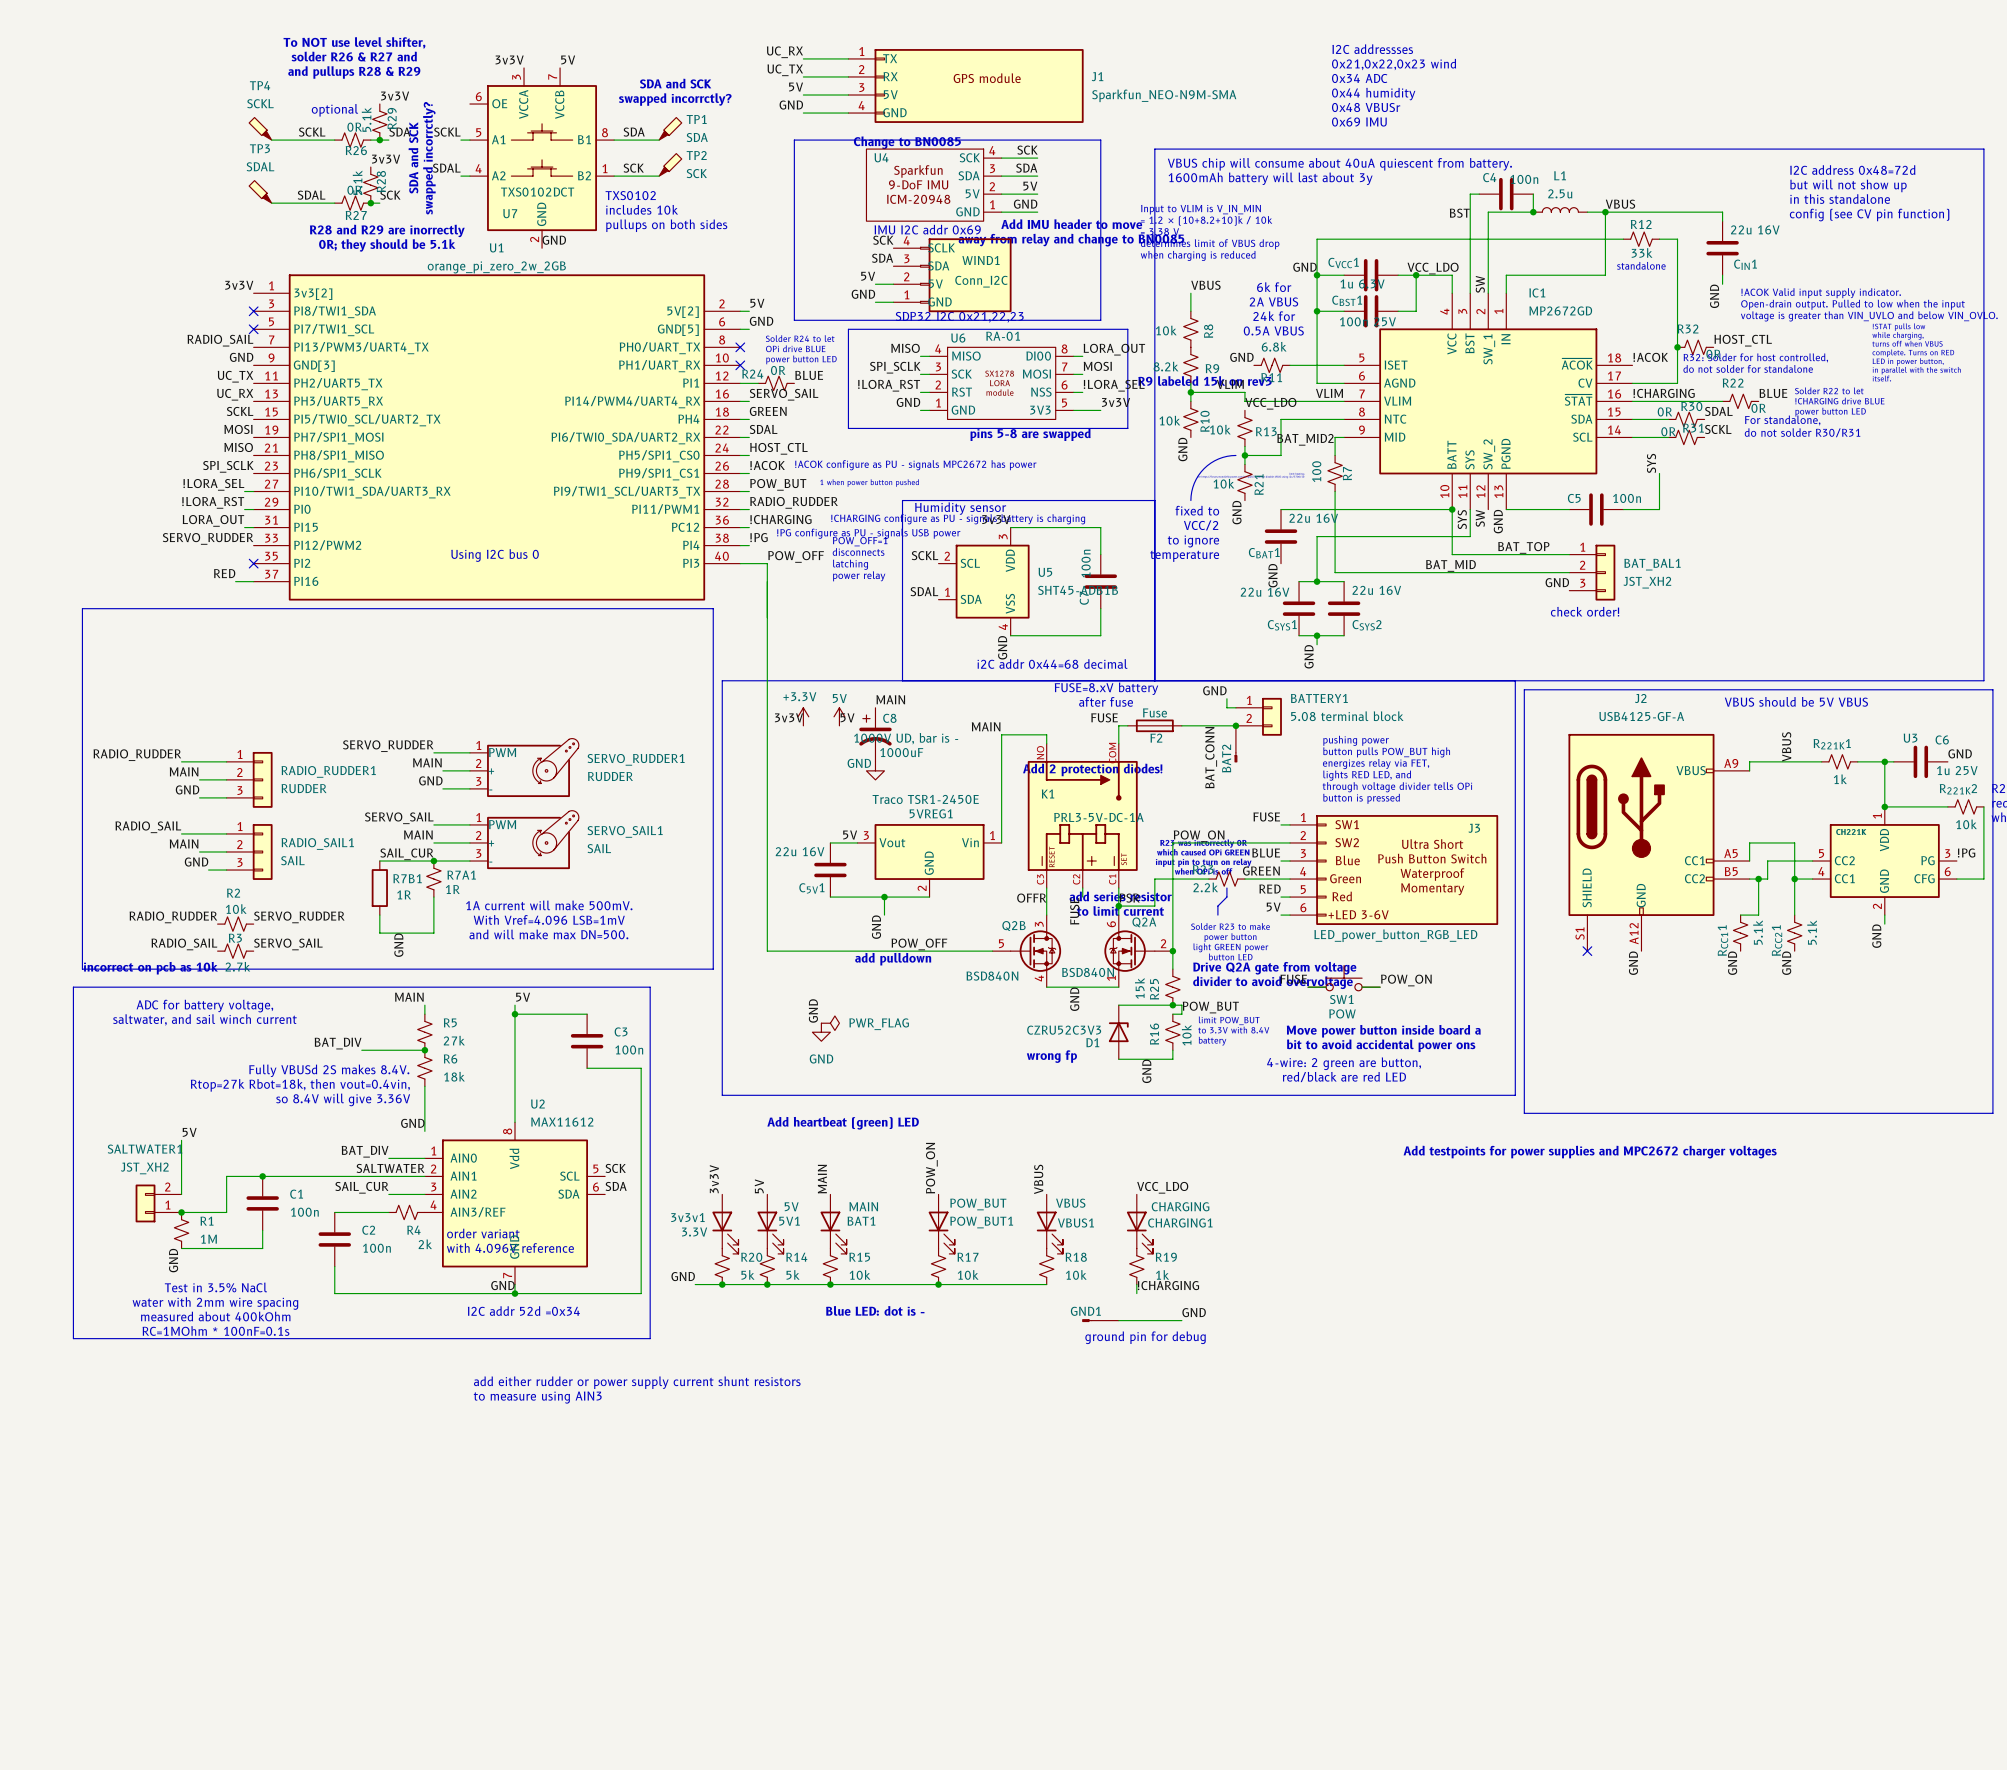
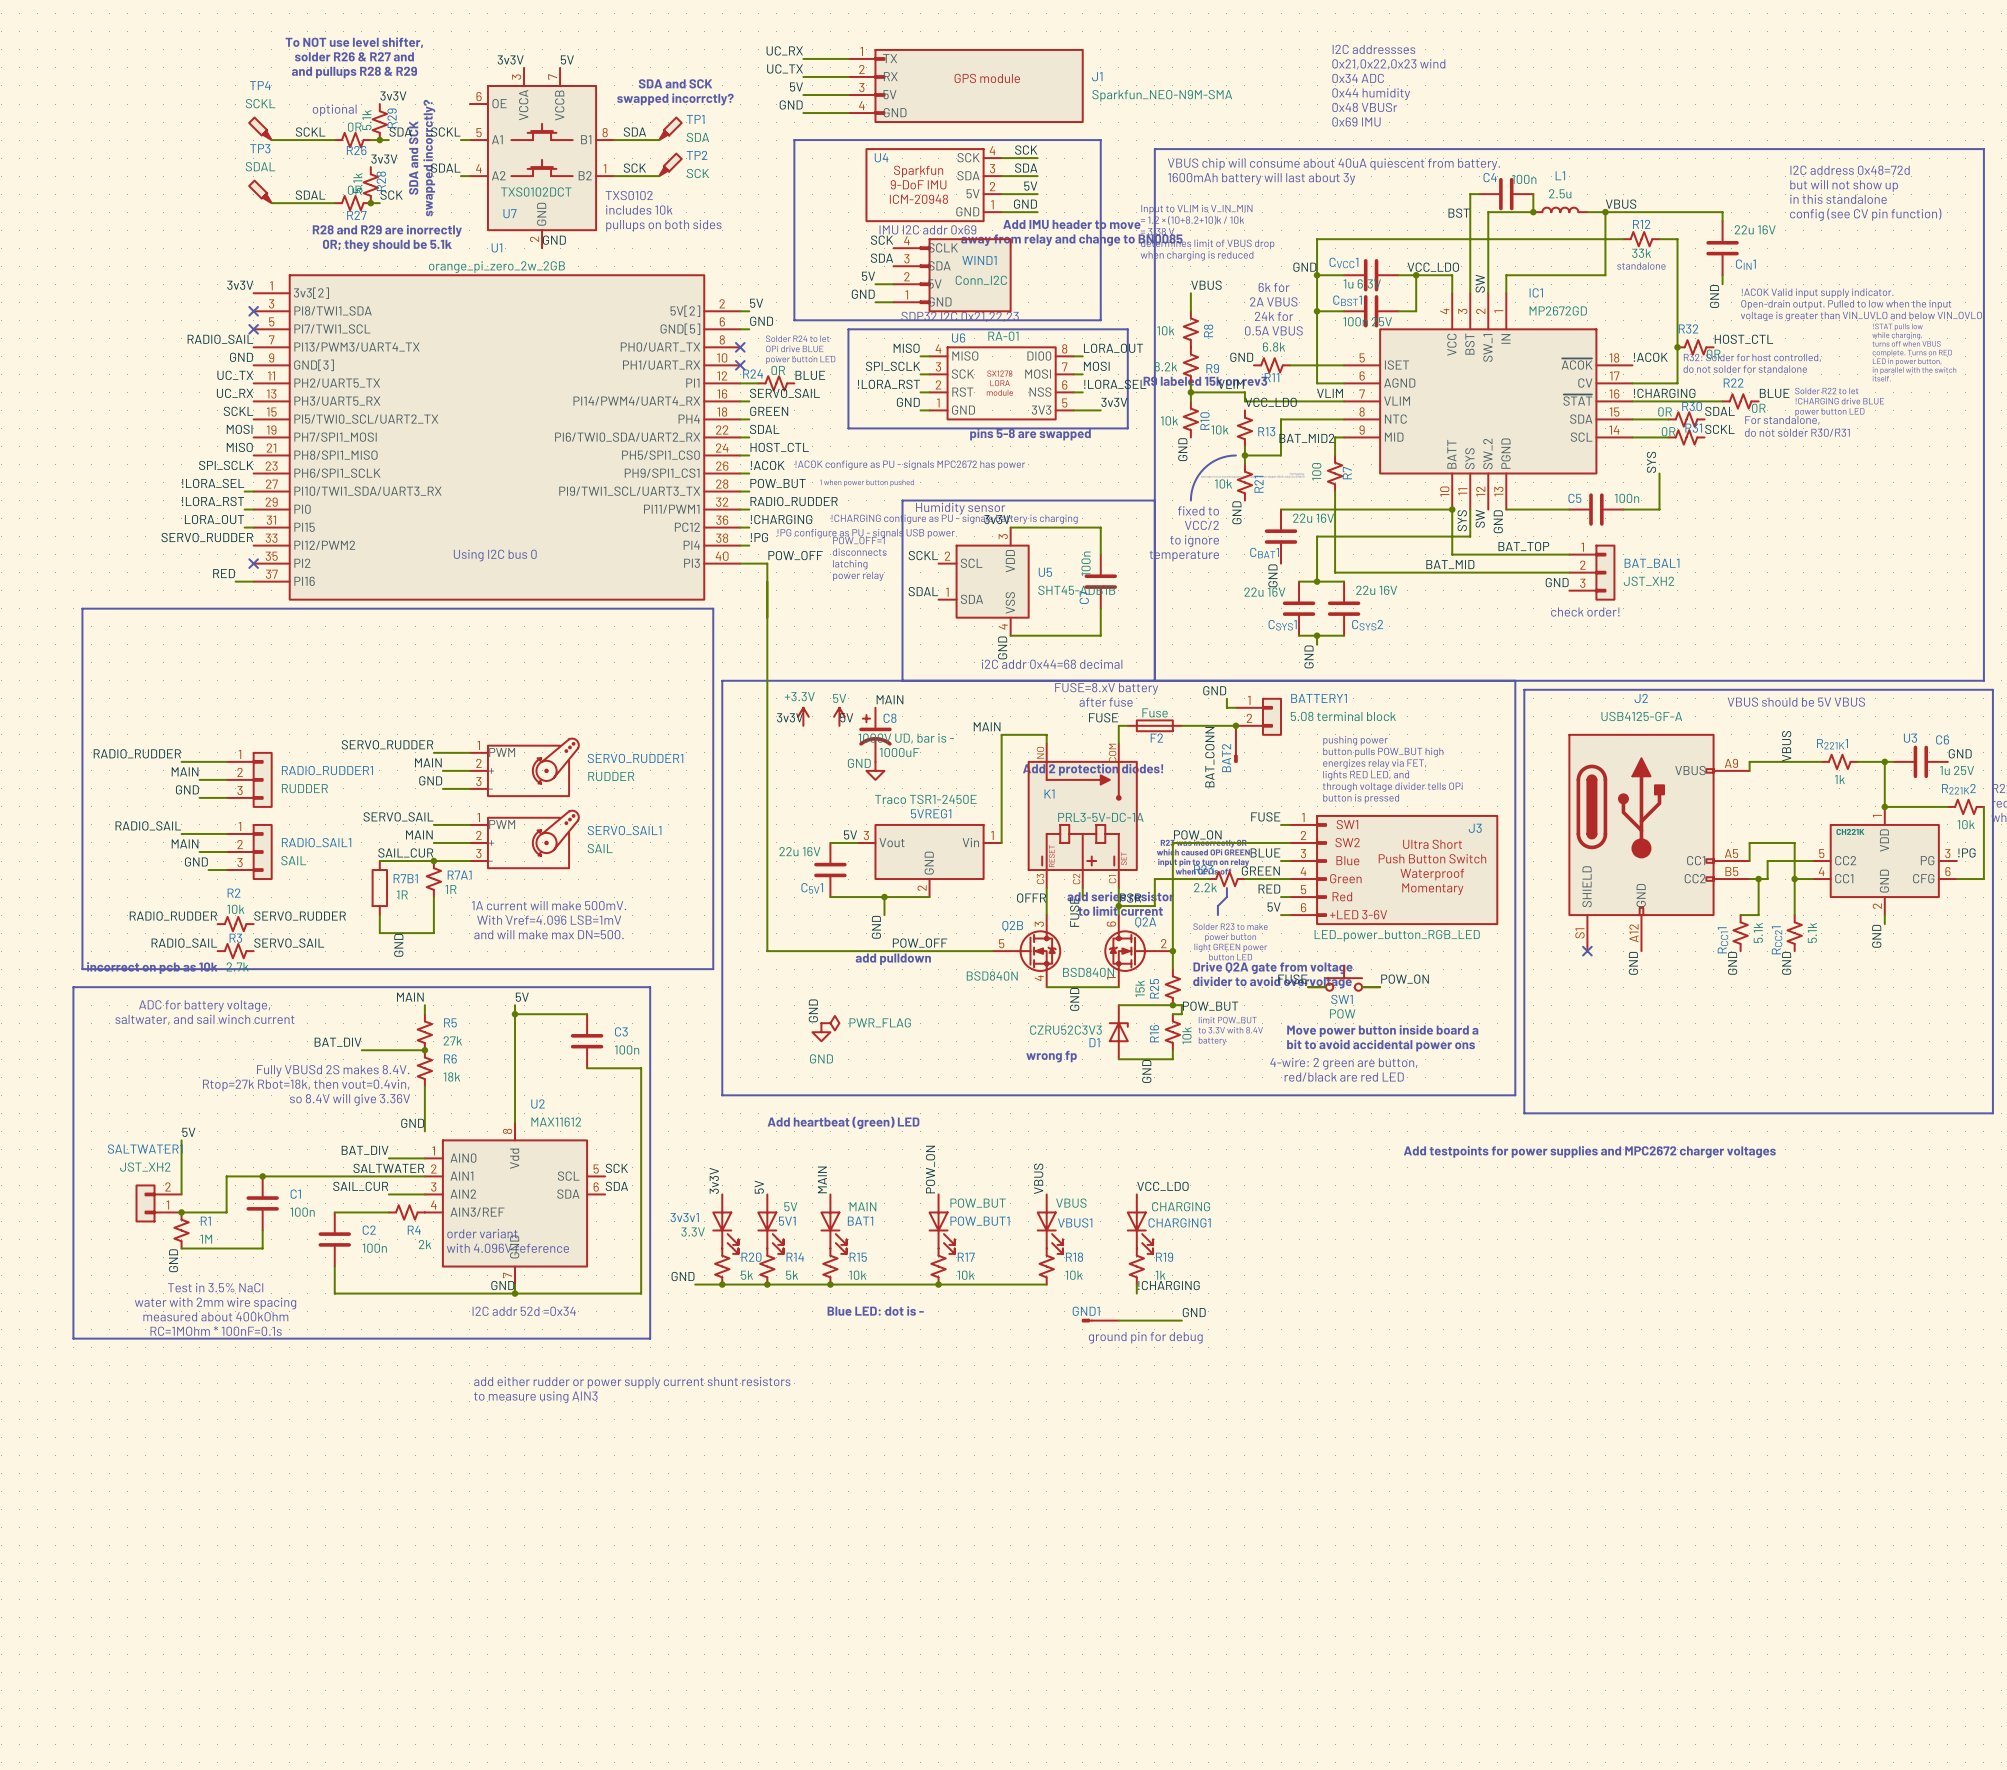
text: Change to BN0085 (907, 142) -> none

